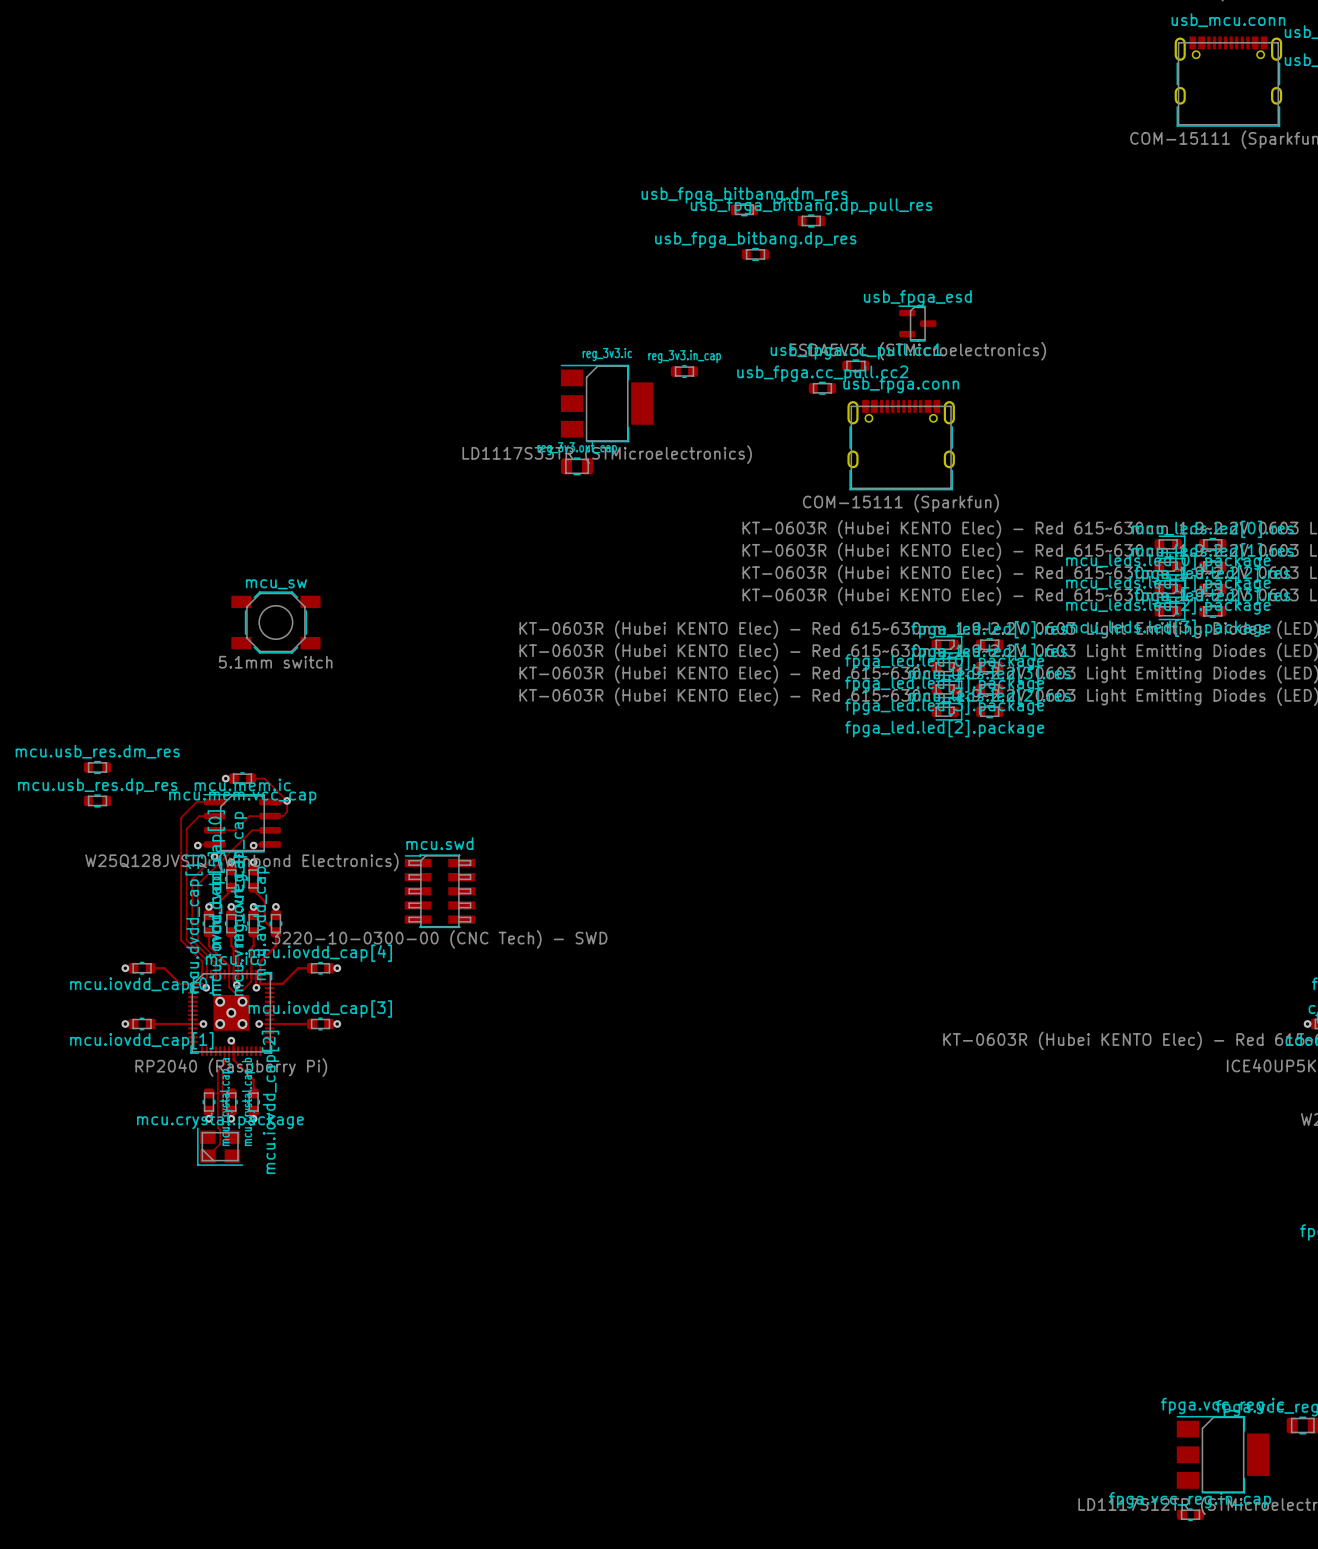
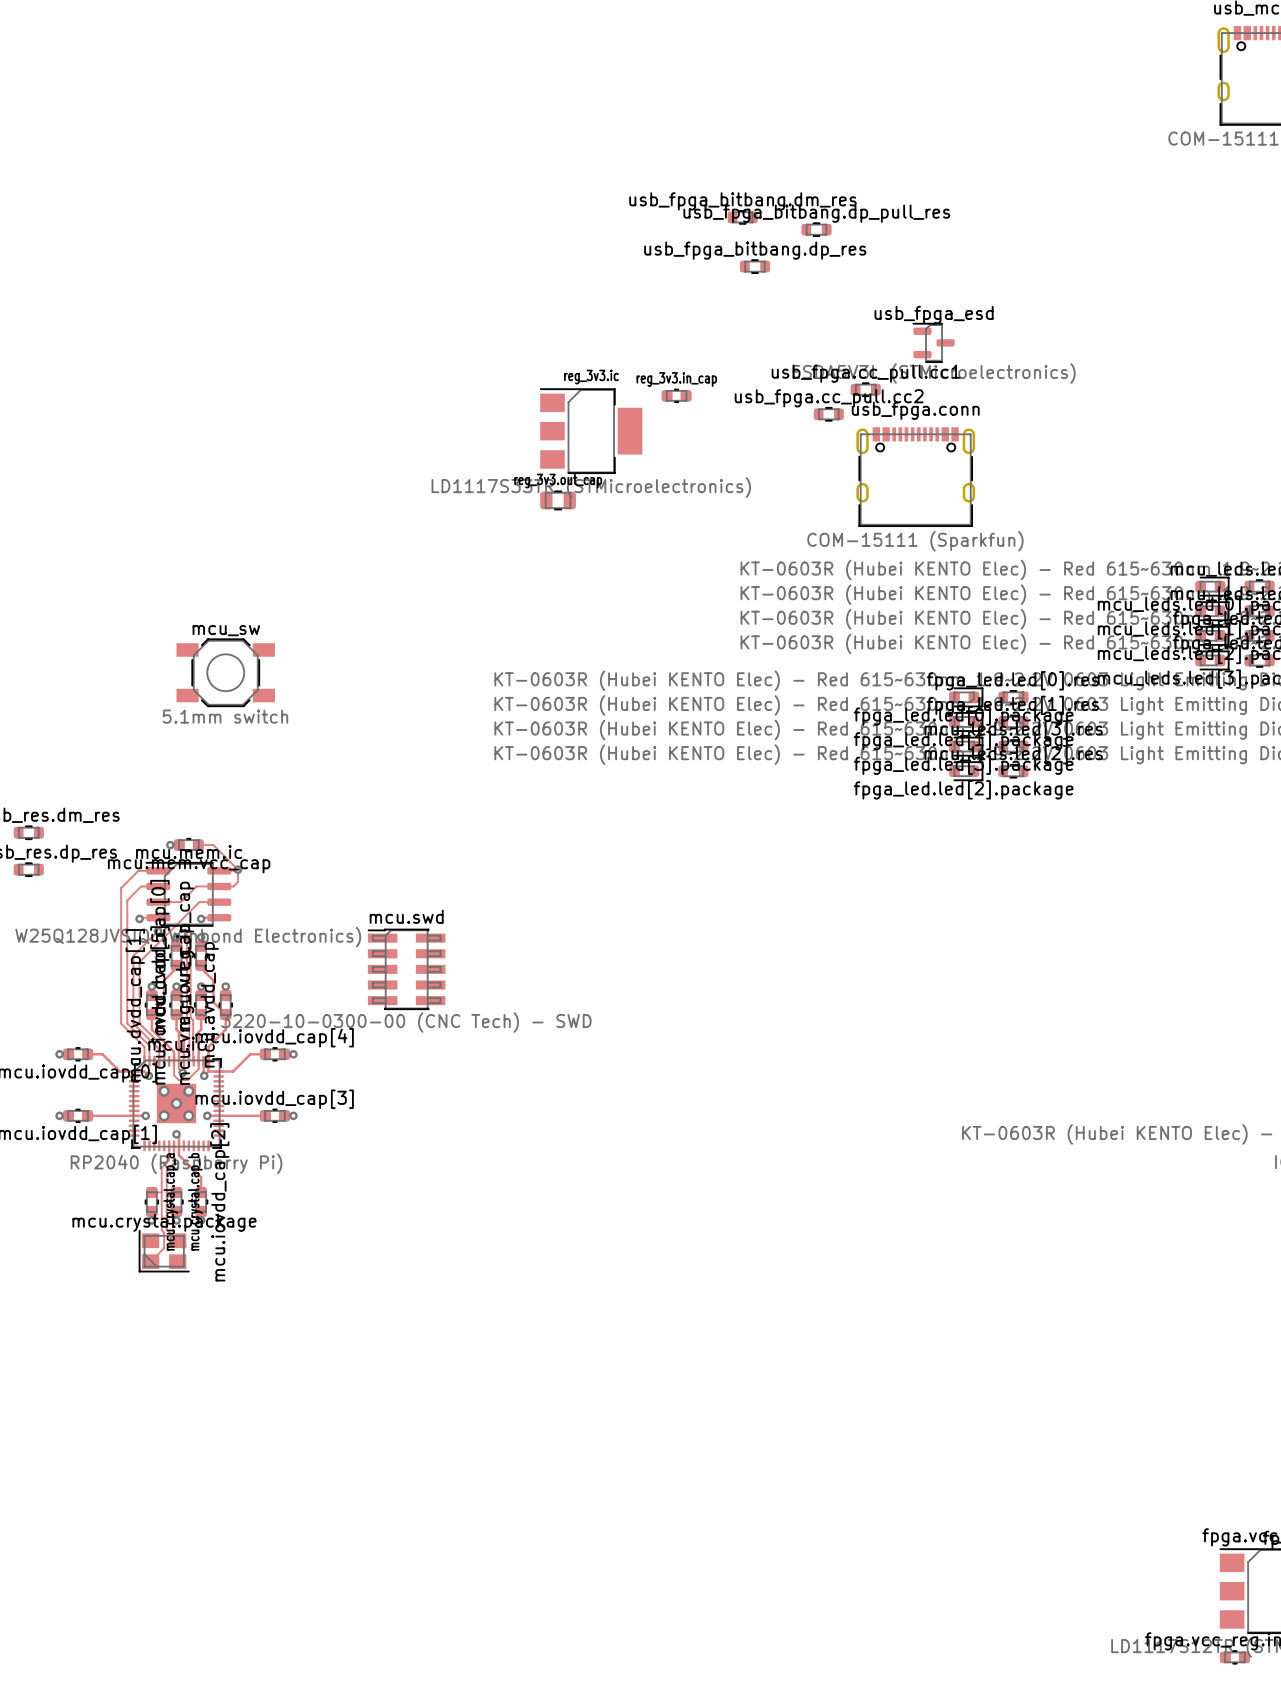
track: none -> (186, 931) (188, 1061)
track: none -> (190, 931) (190, 1017) (193, 1020) (193, 1061)

